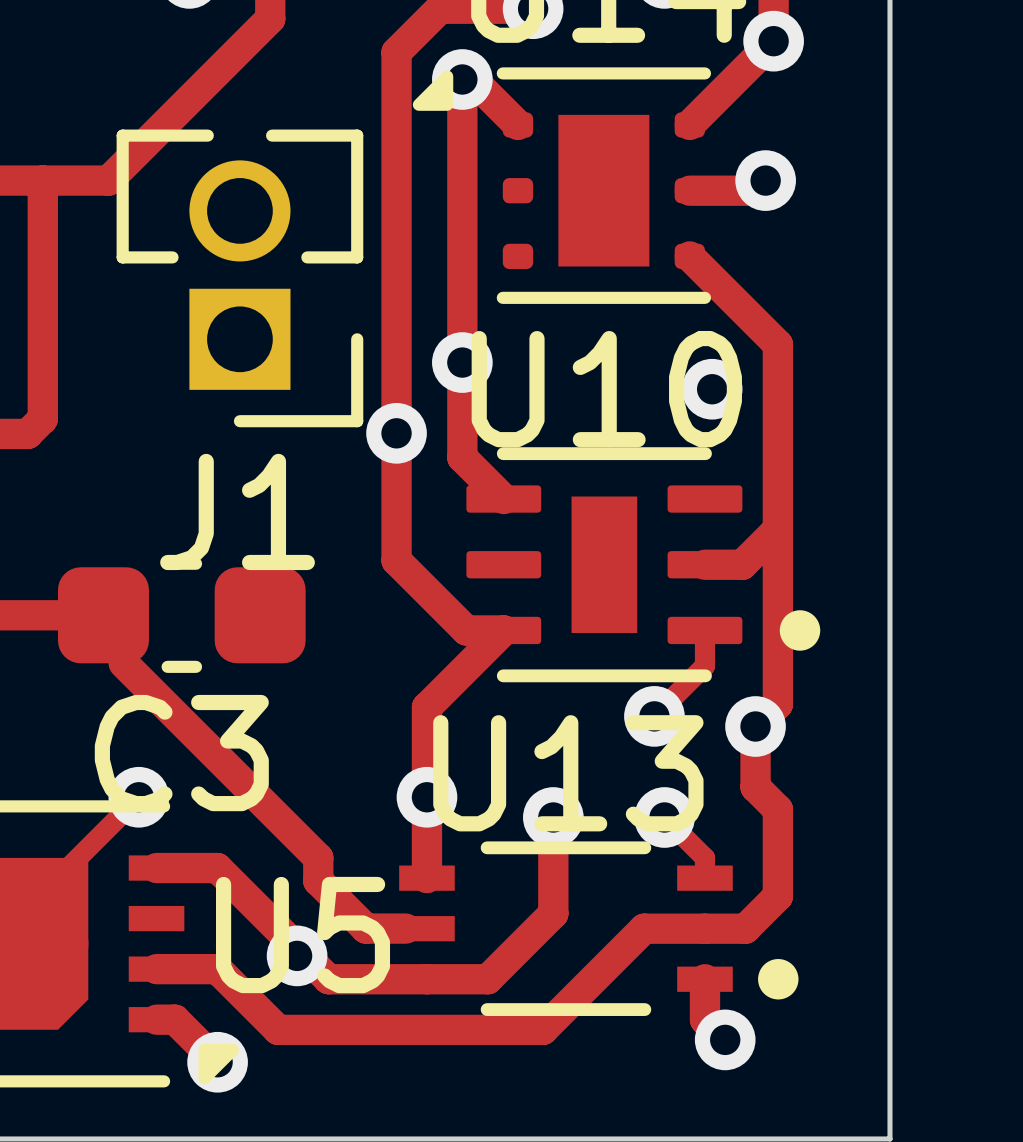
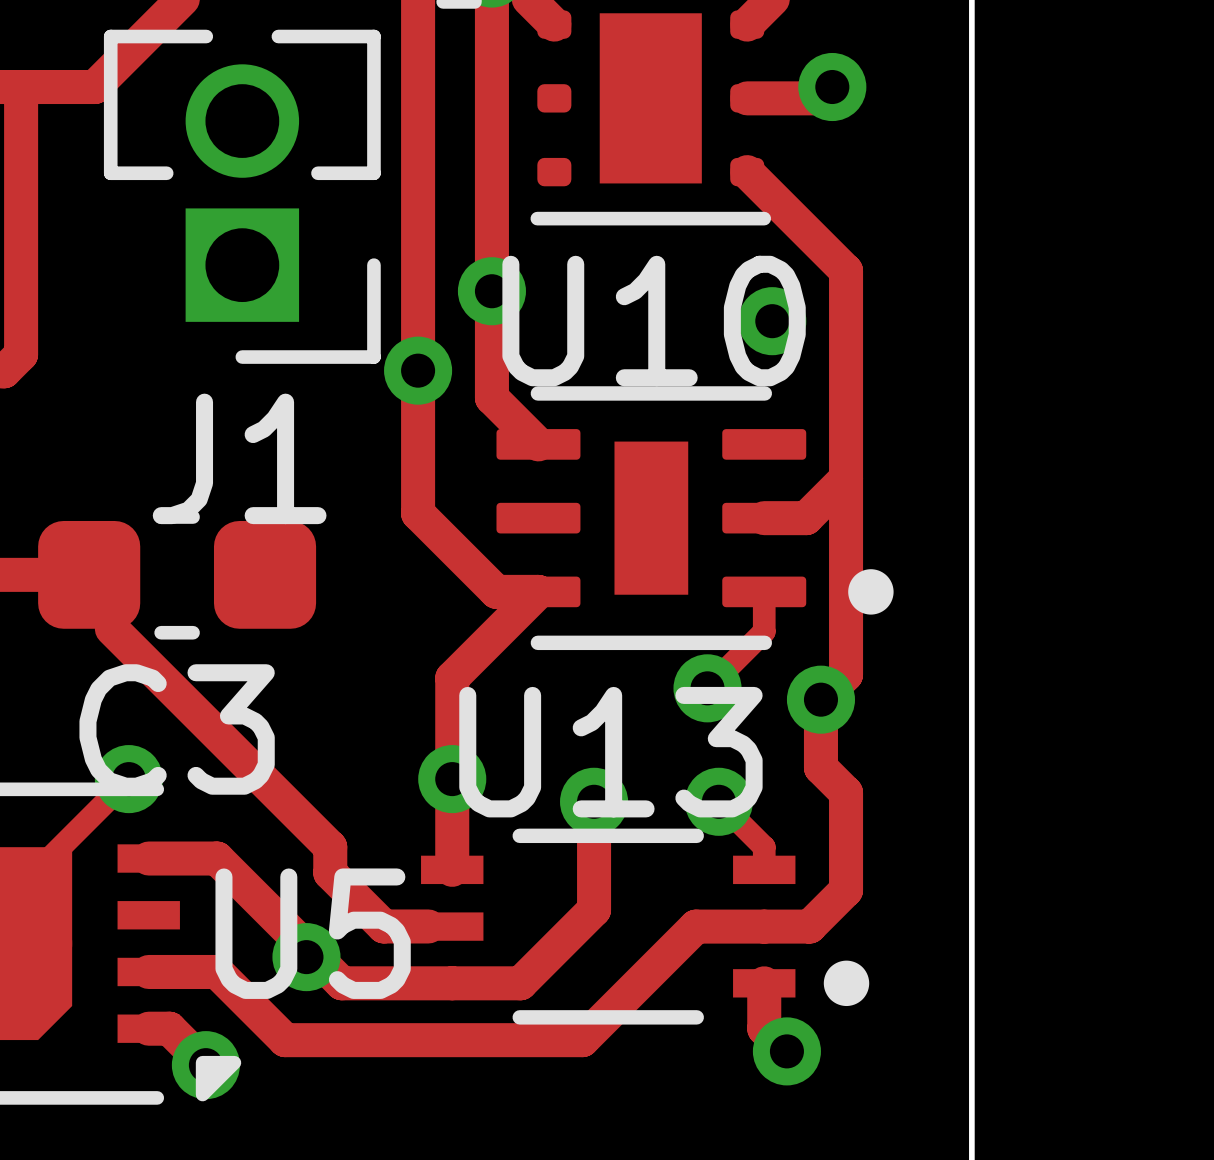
via position: (217, 1062) -> (205, 1065)

